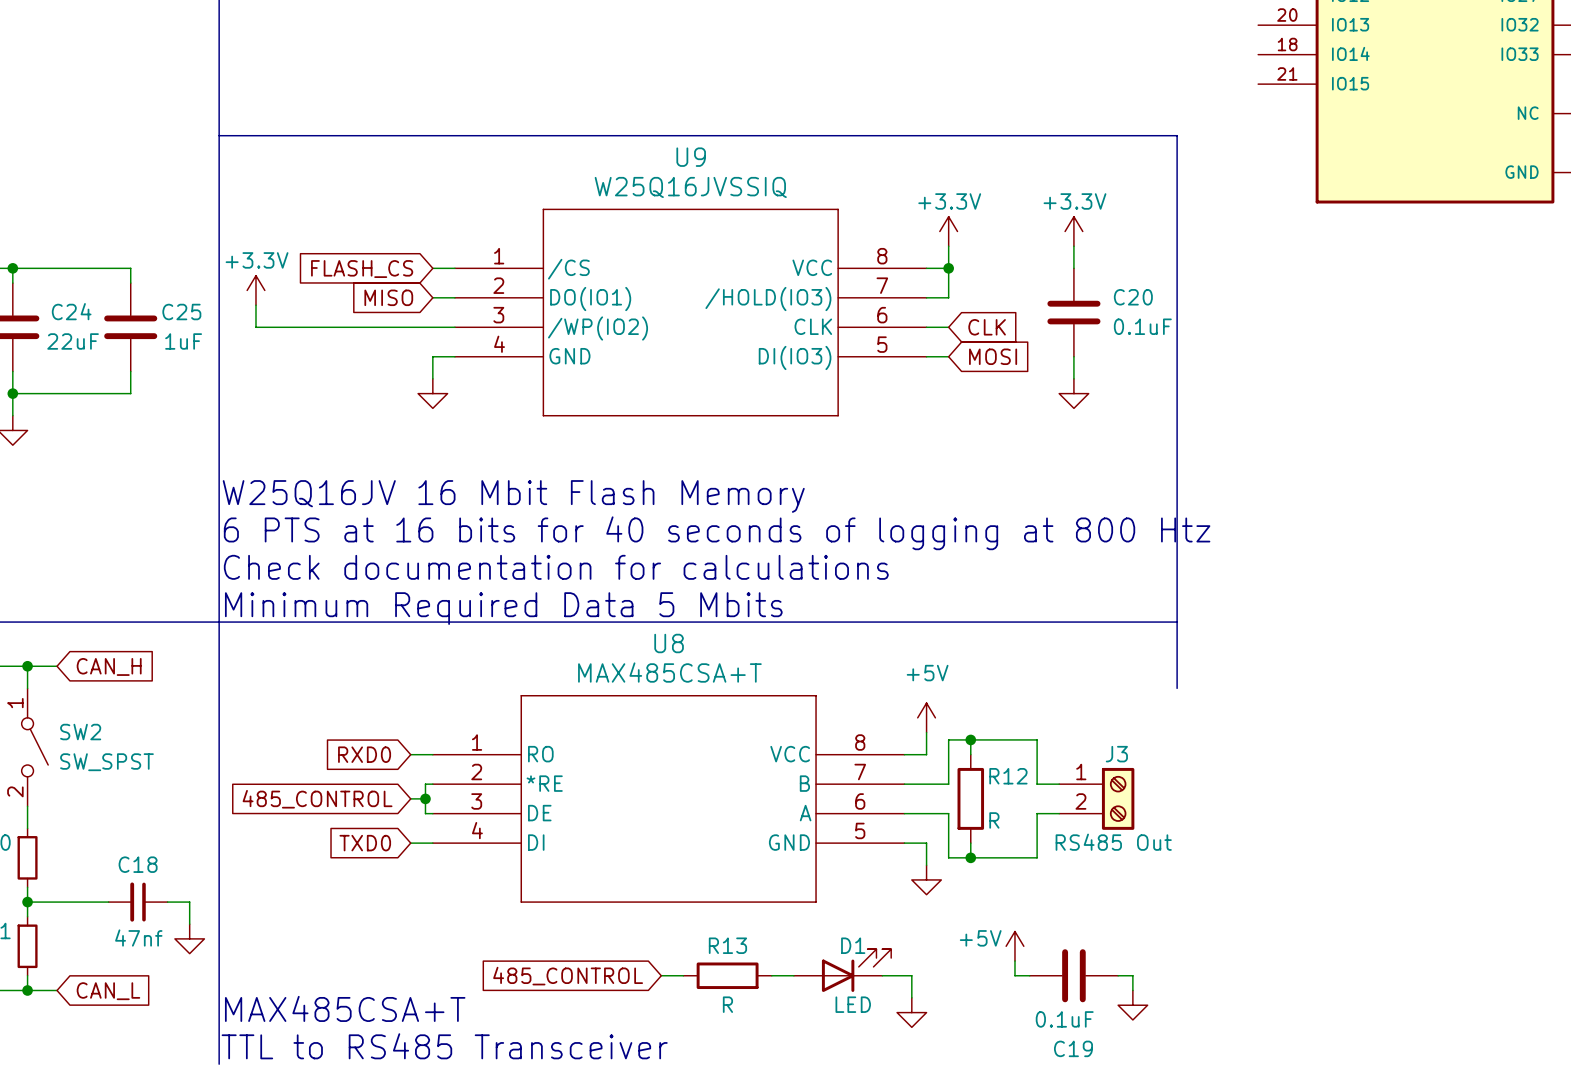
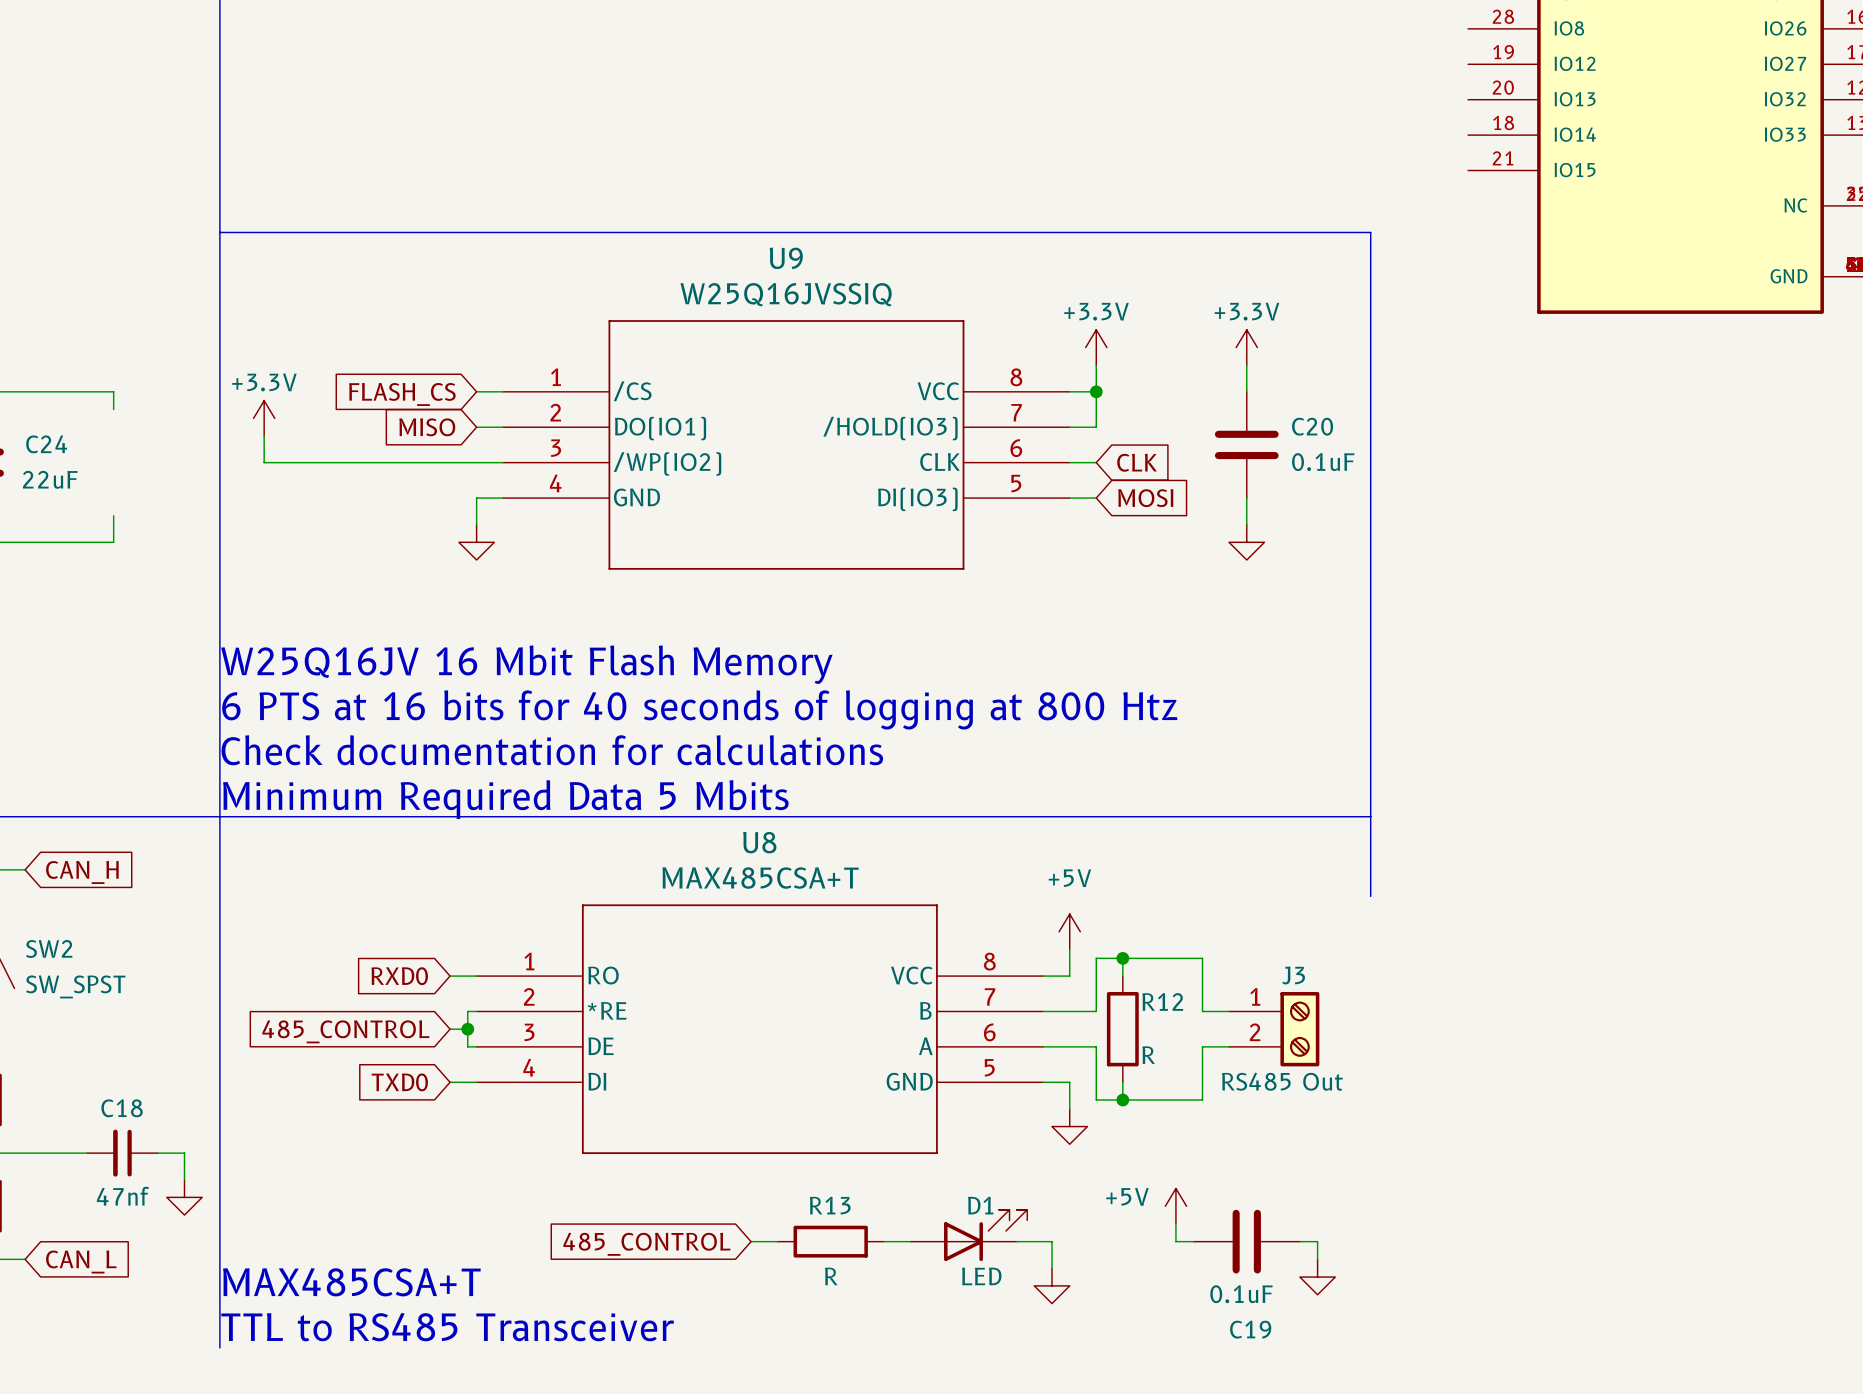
C25: 1uF (130, 327) -> none

